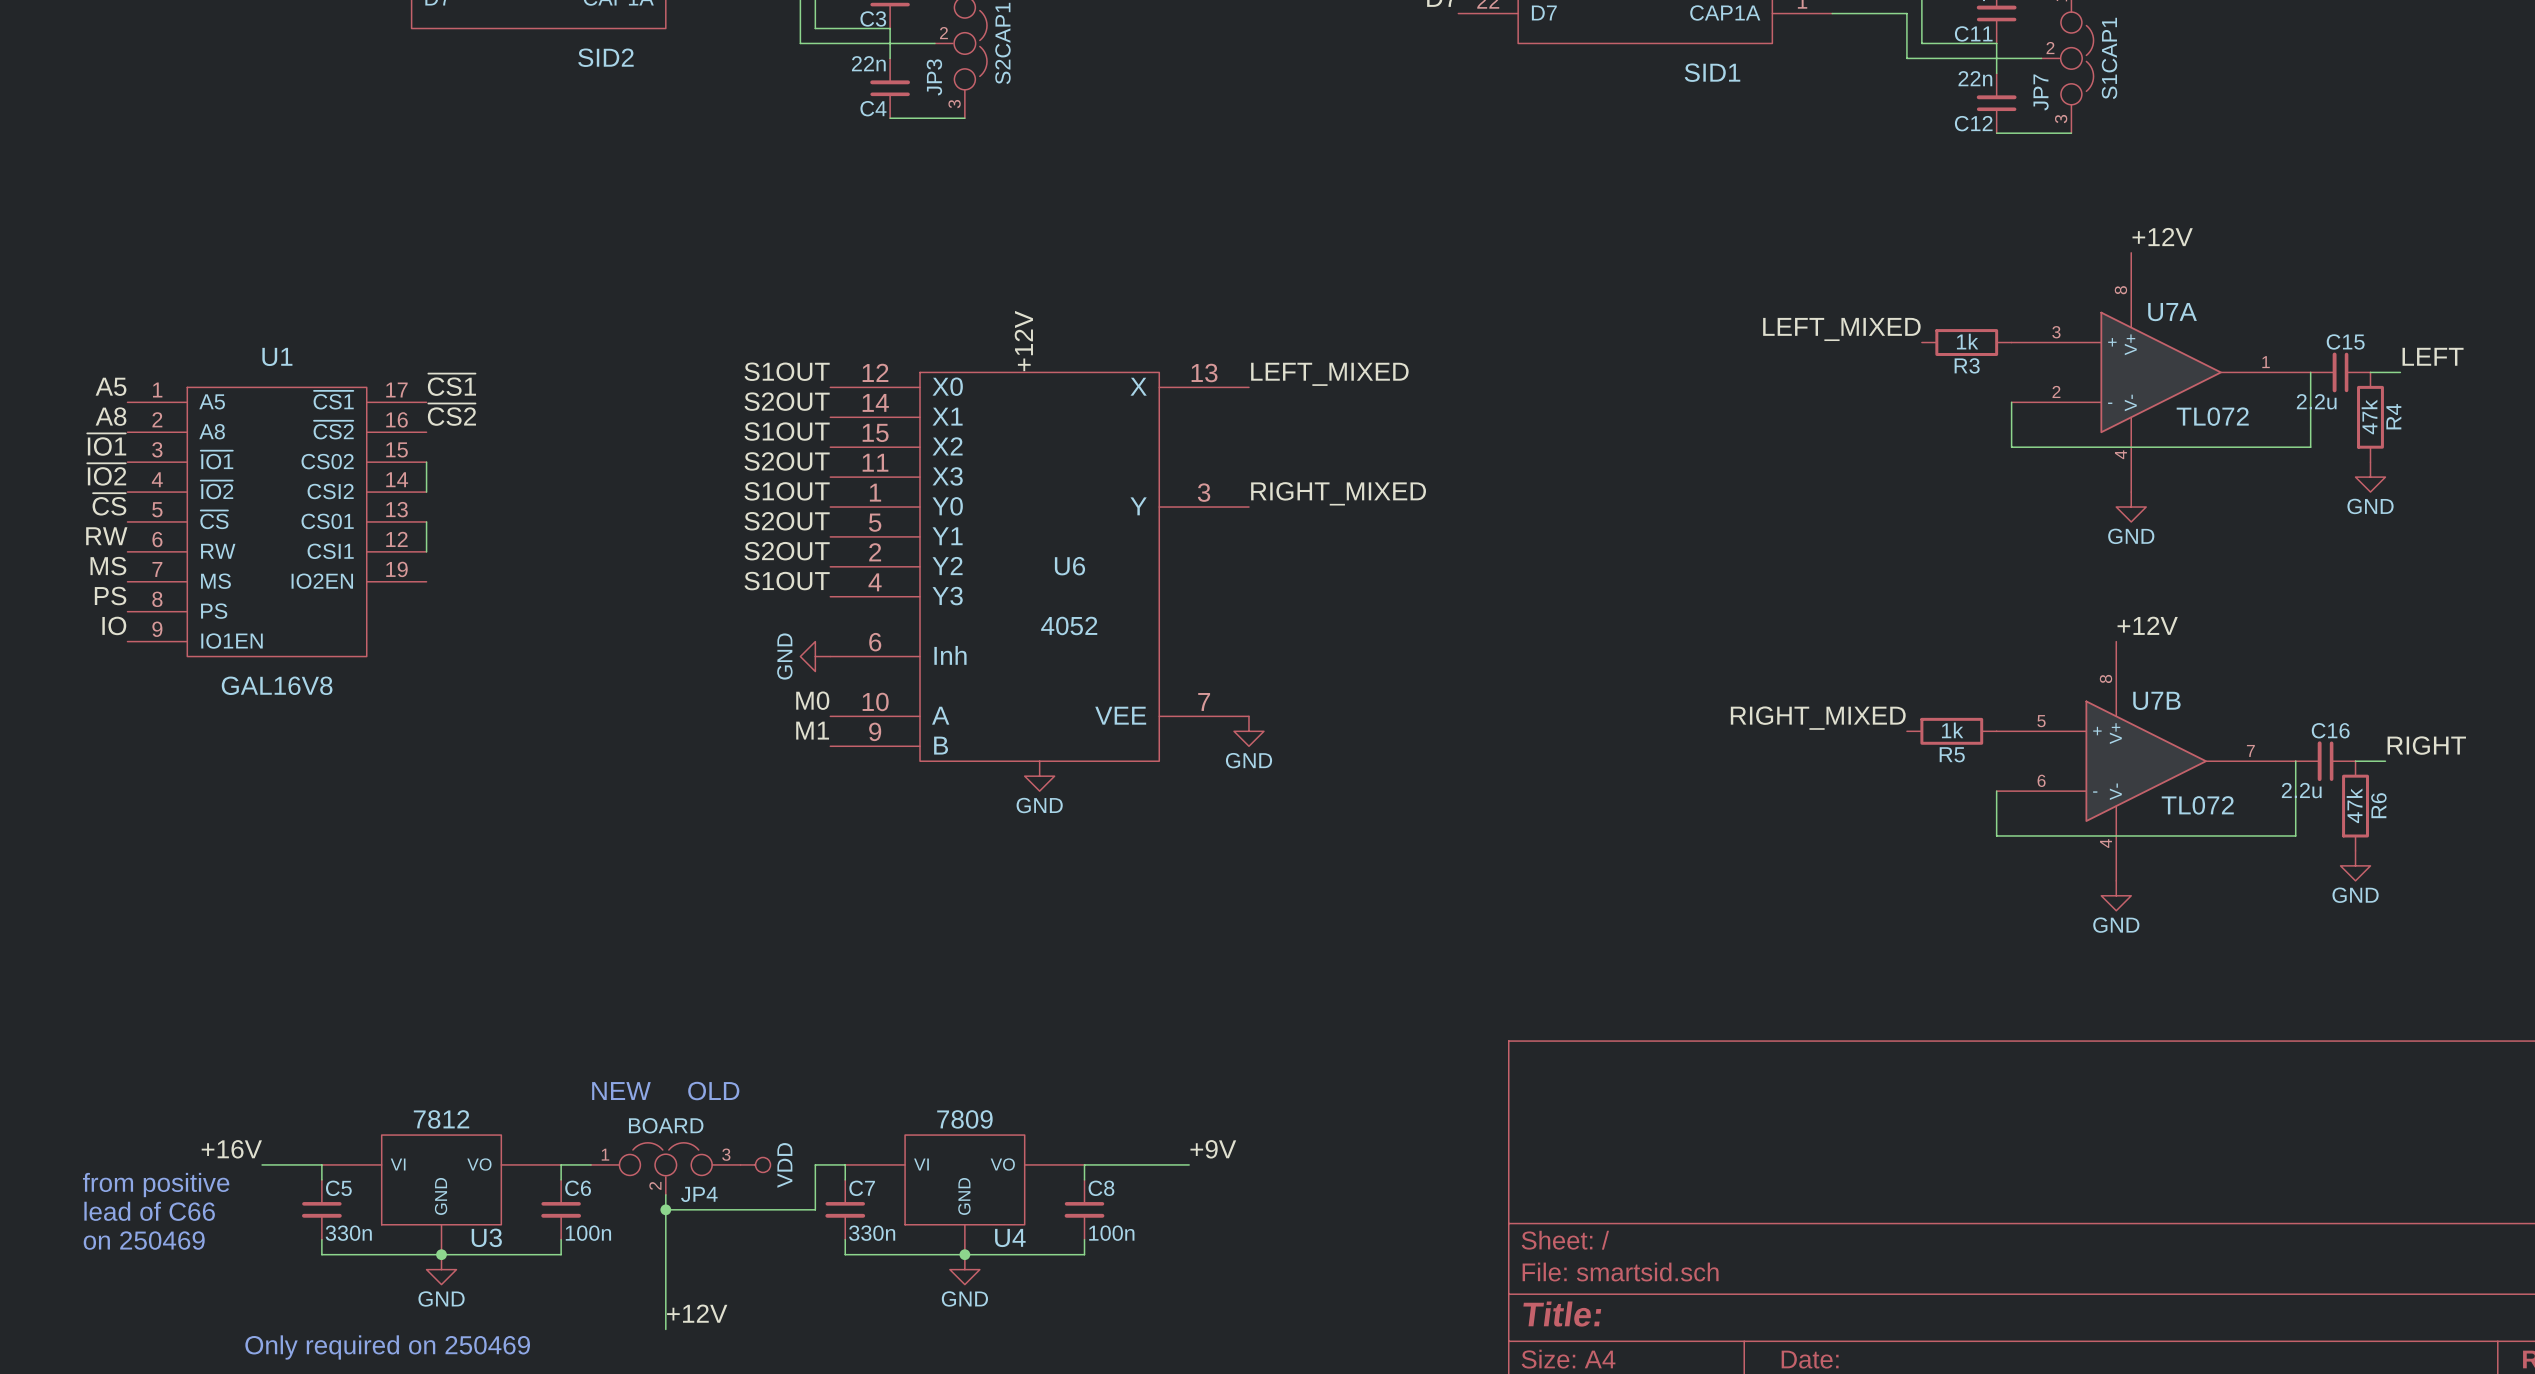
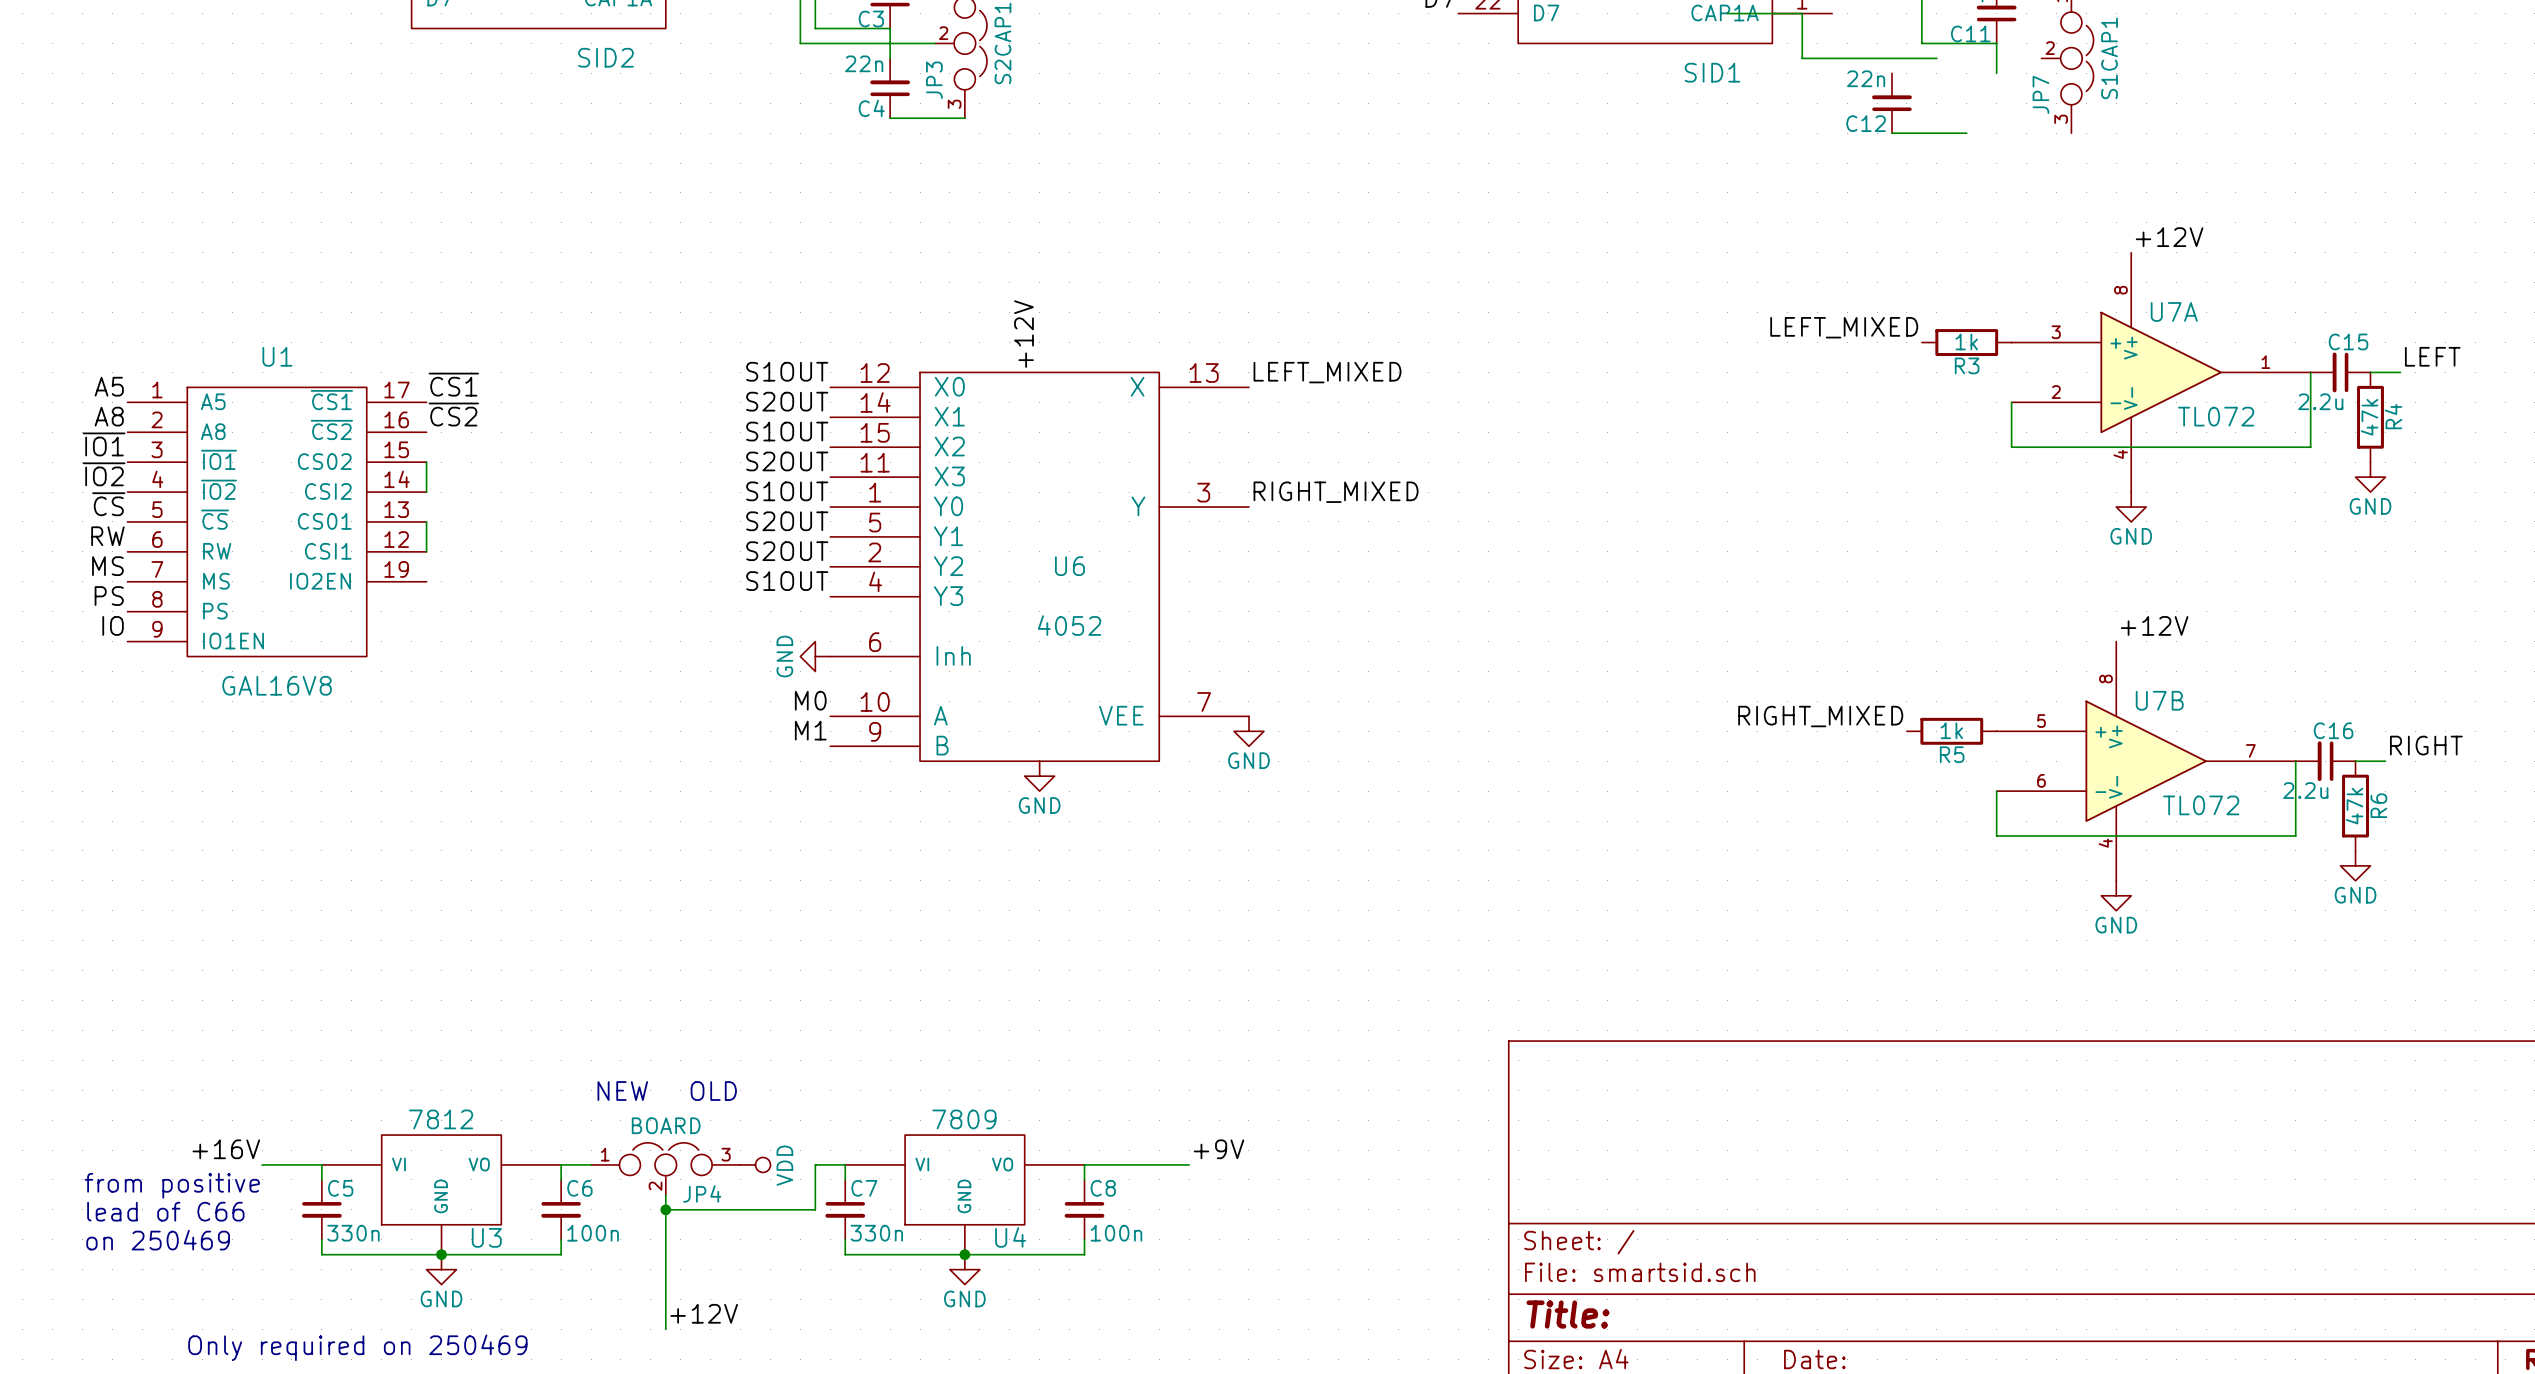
wire: (1832, 13) (1906, 13) (1906, 58) -> (1727, 13) (1802, 13) (1802, 58) (1906, 58)
wire: (1936, 58) (2041, 58) -> none
C12 position: (1996, 103) -> (1891, 103)
wire: (1996, 133) (2071, 133) -> (1891, 133) (1966, 133)

